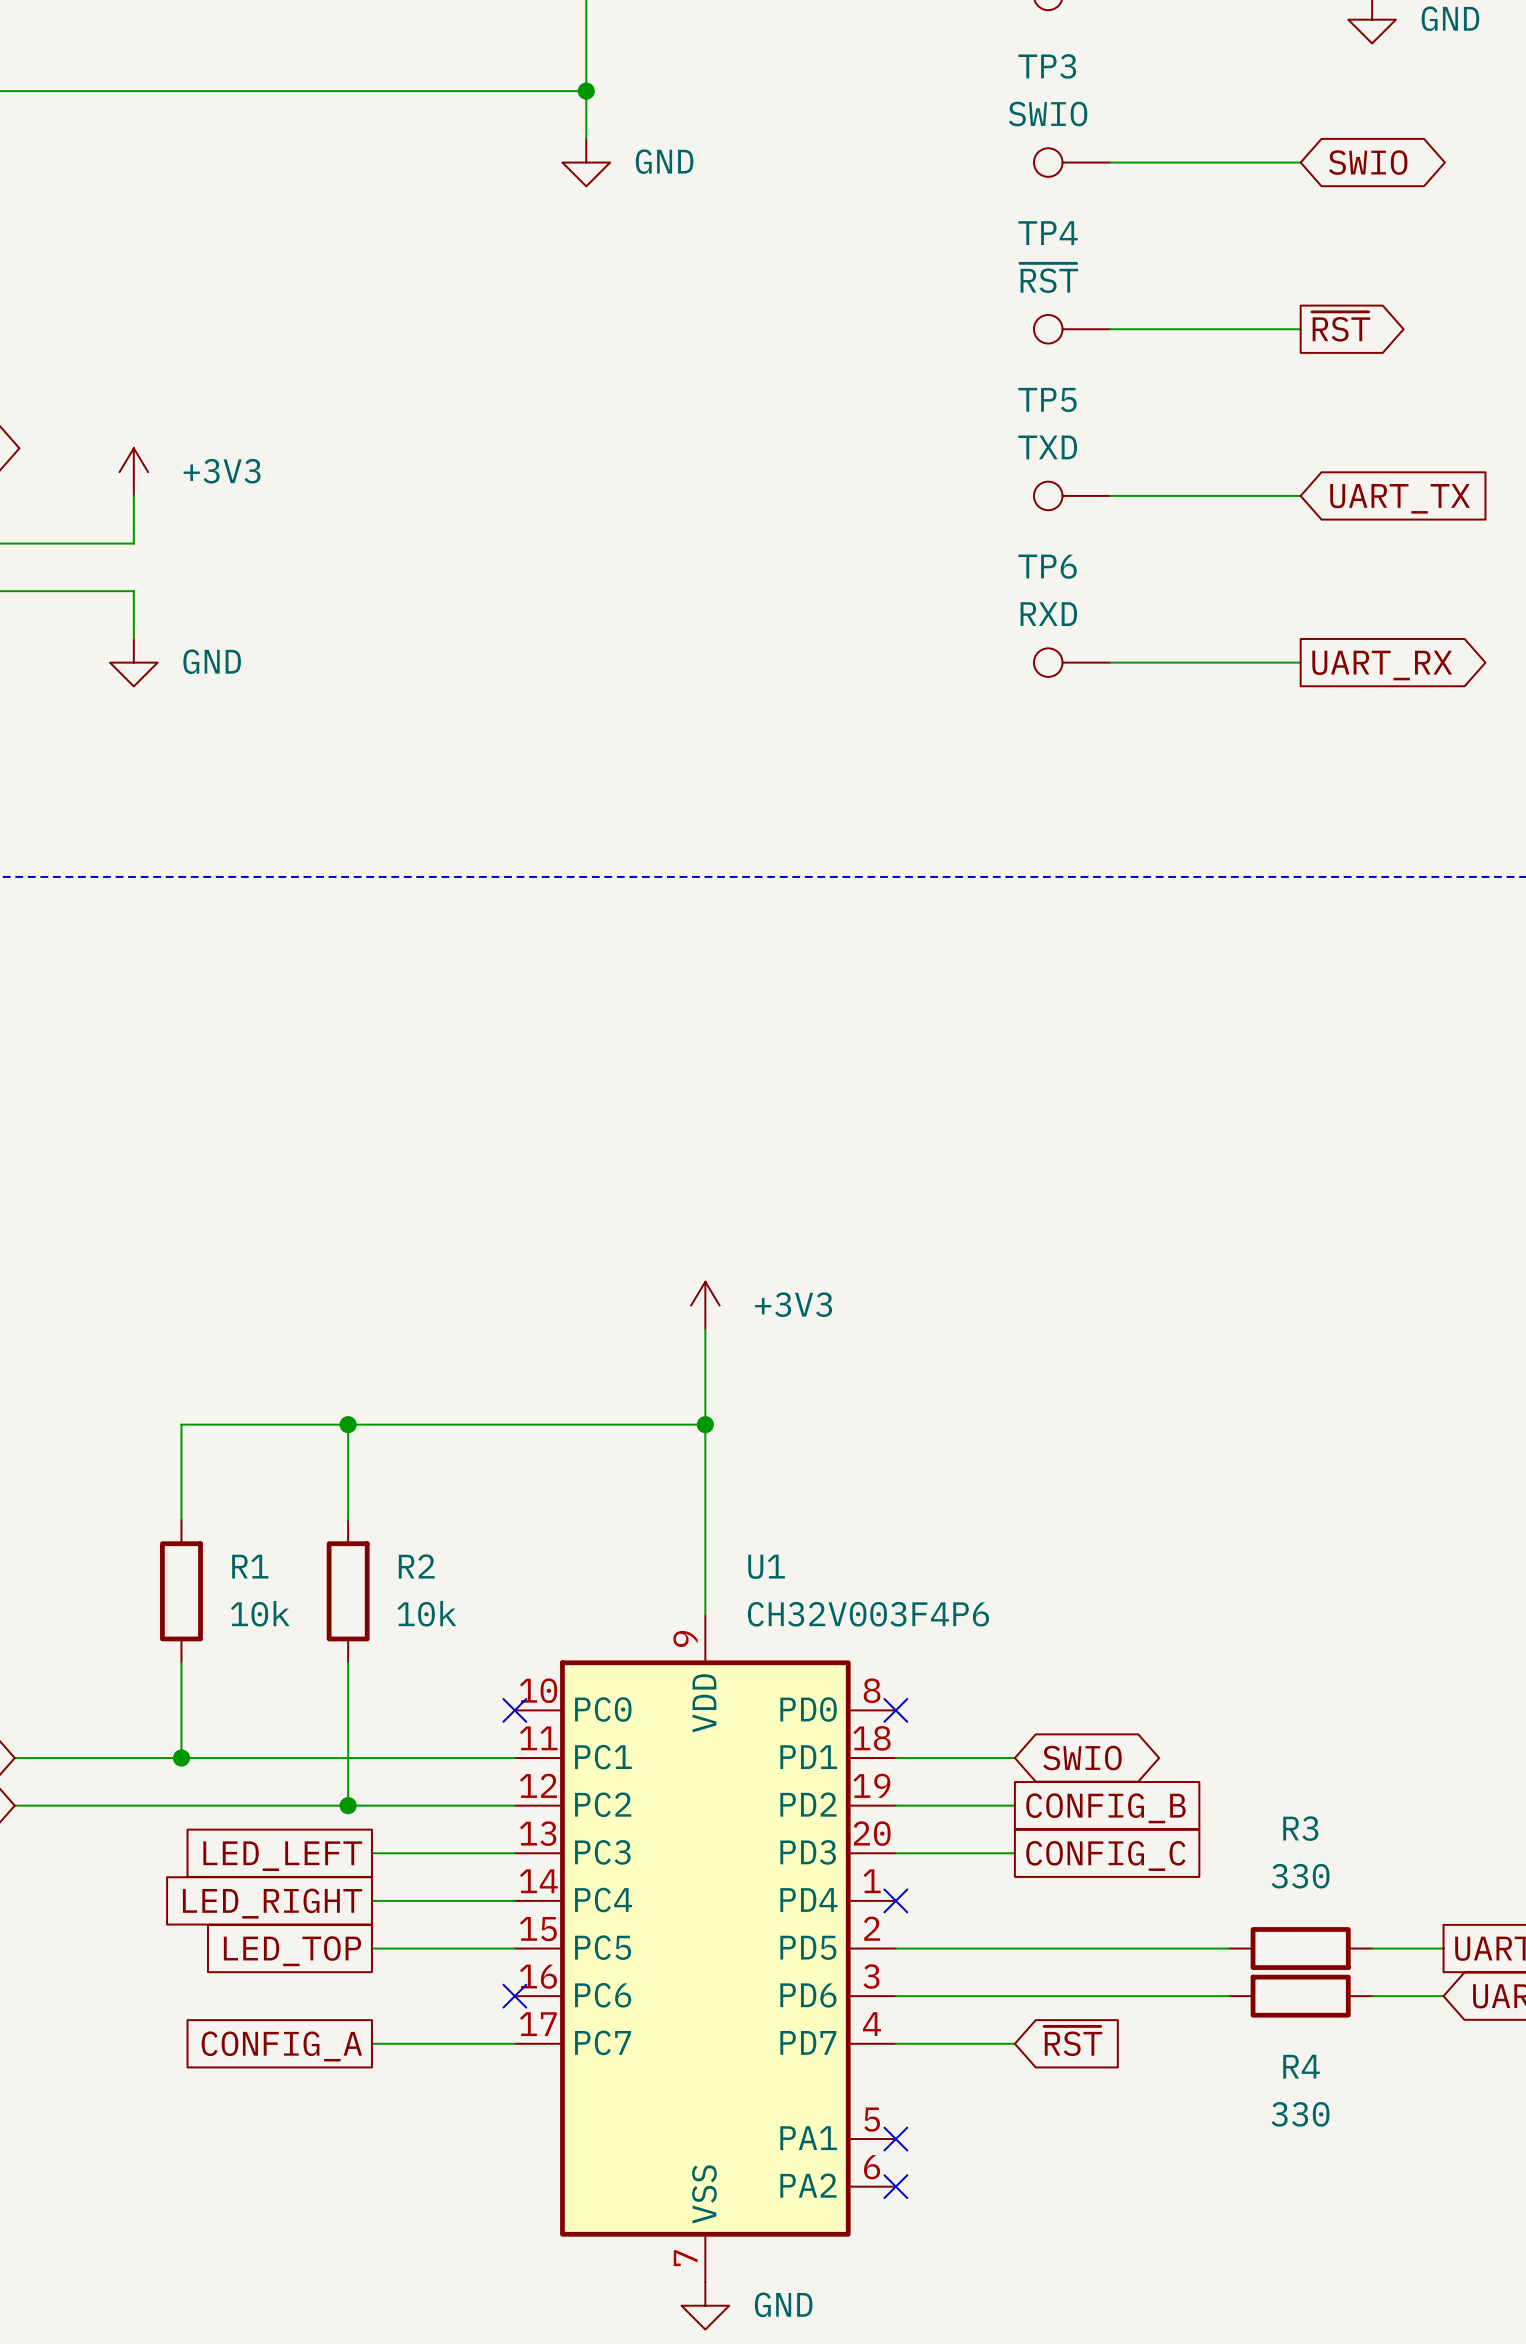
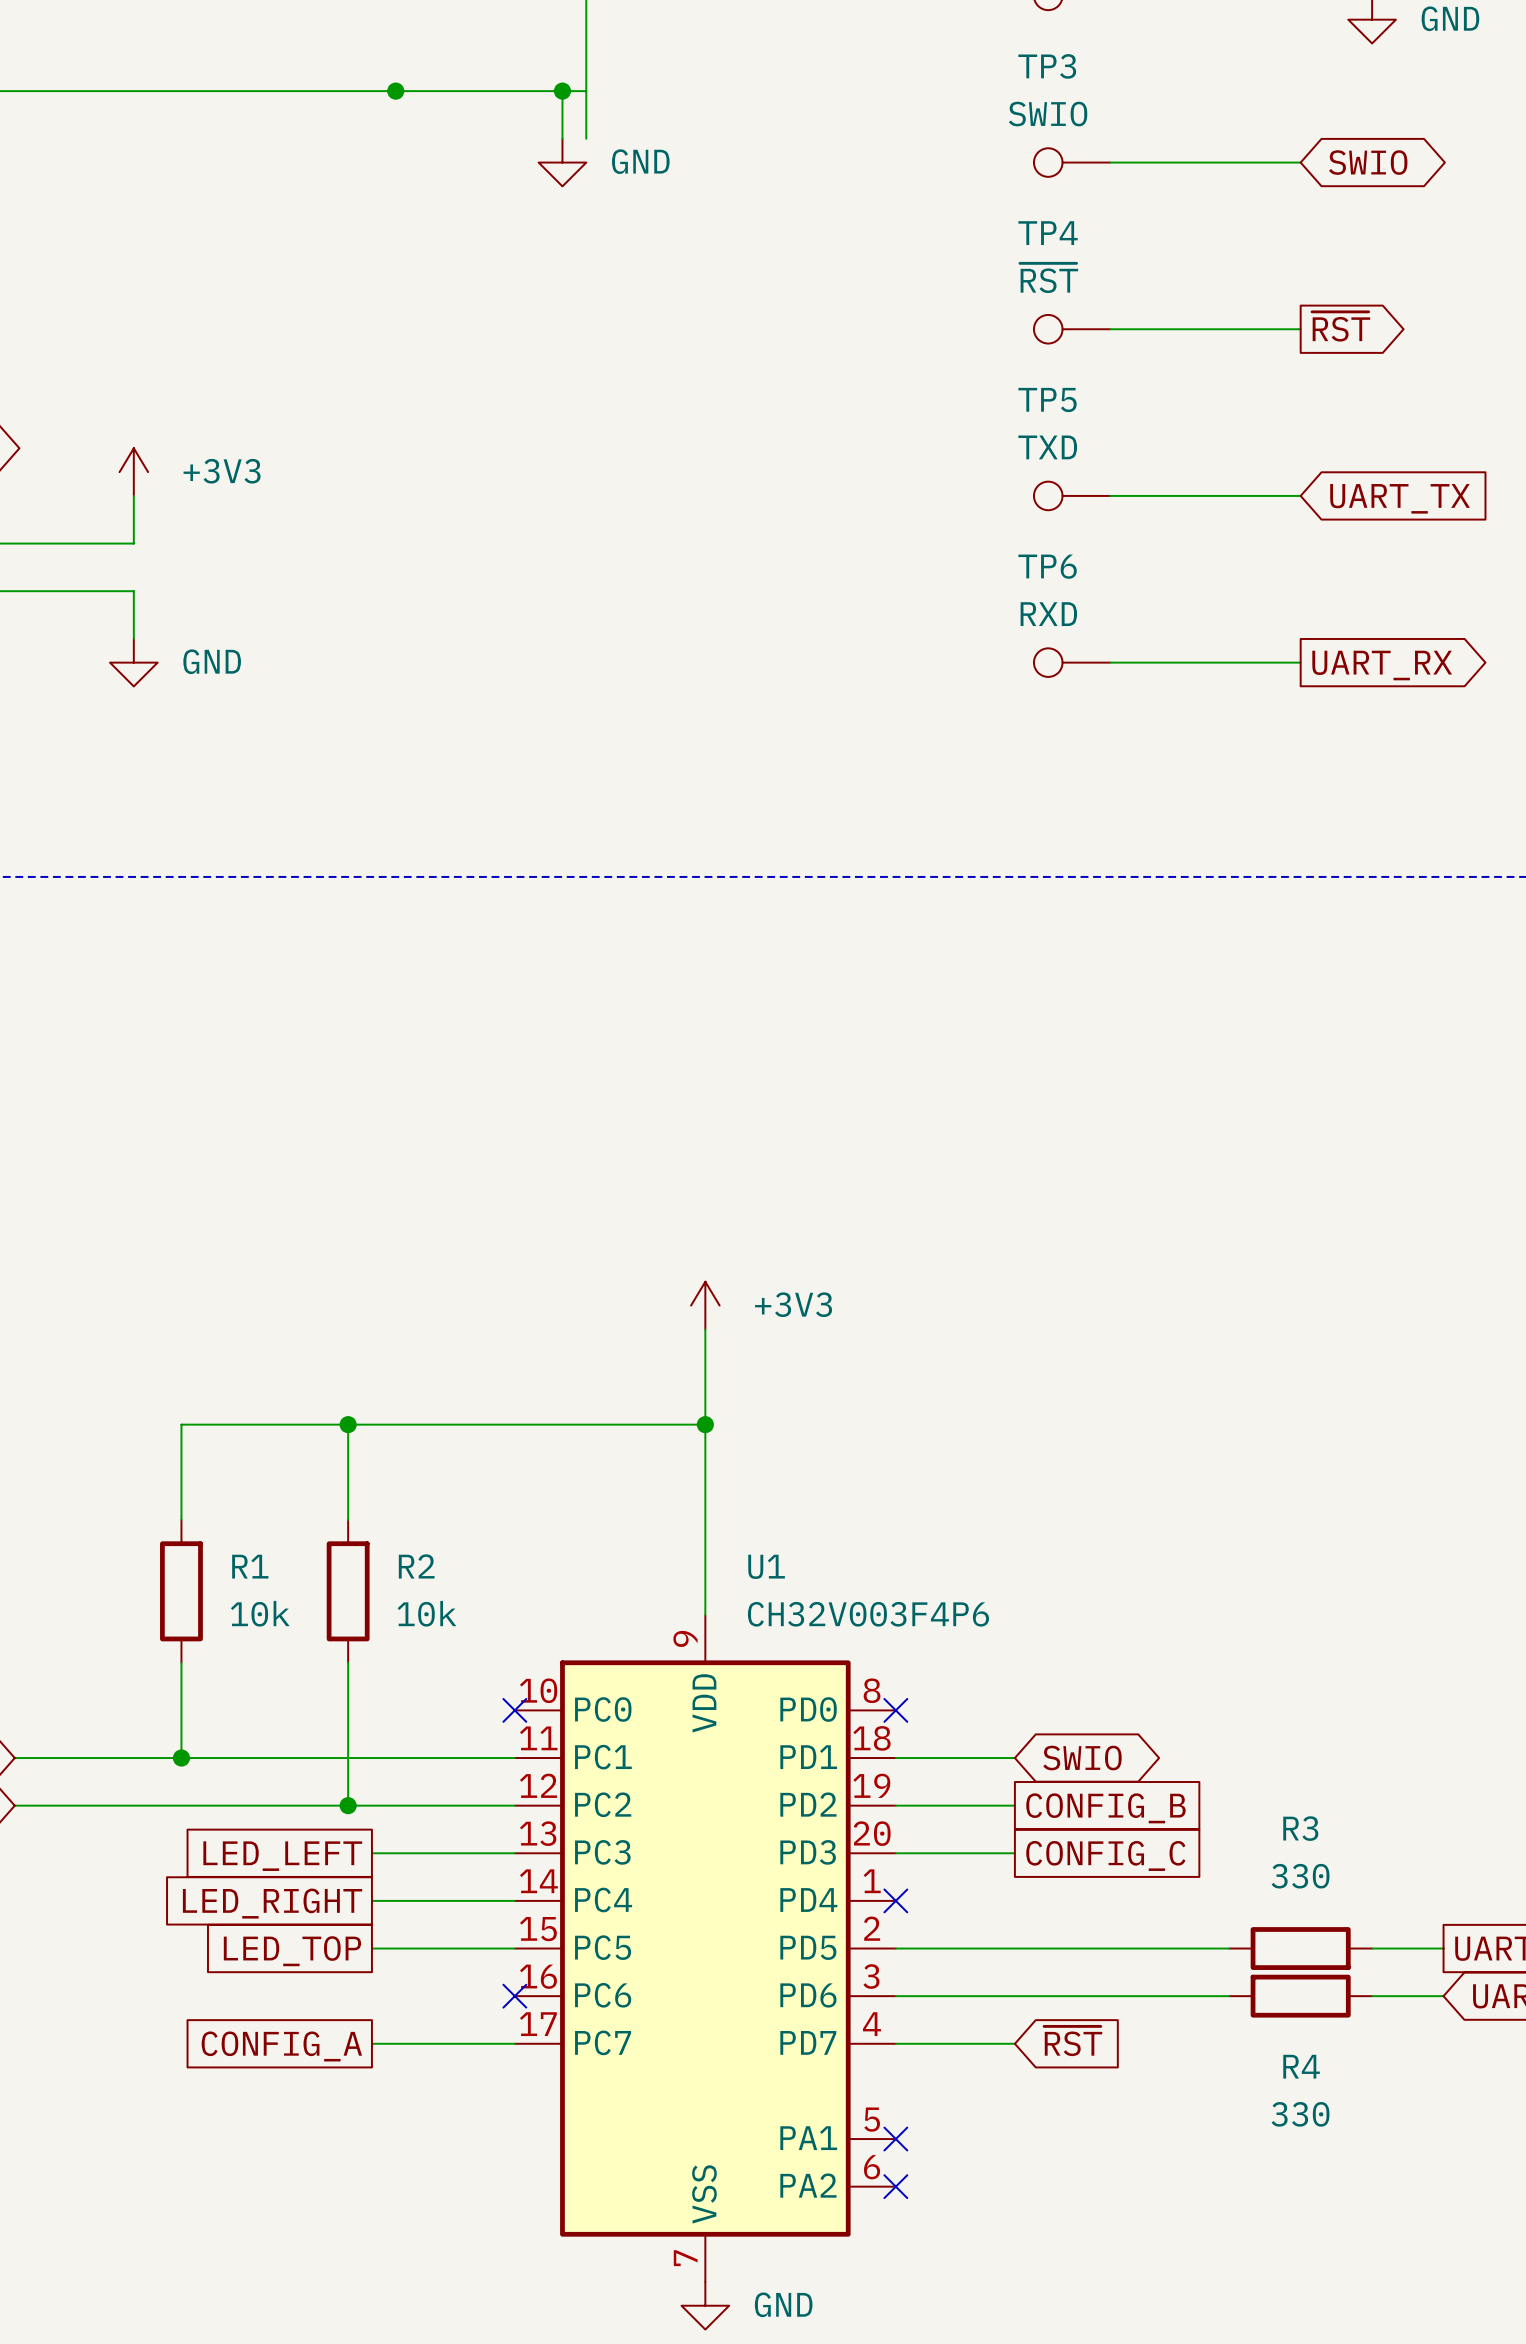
junction: none -> (395, 91)
wire: none -> (562, 91) (562, 138)
junction position: (586, 91) -> (562, 91)
power symbol position: GND (586, 162) -> GND (562, 162)

